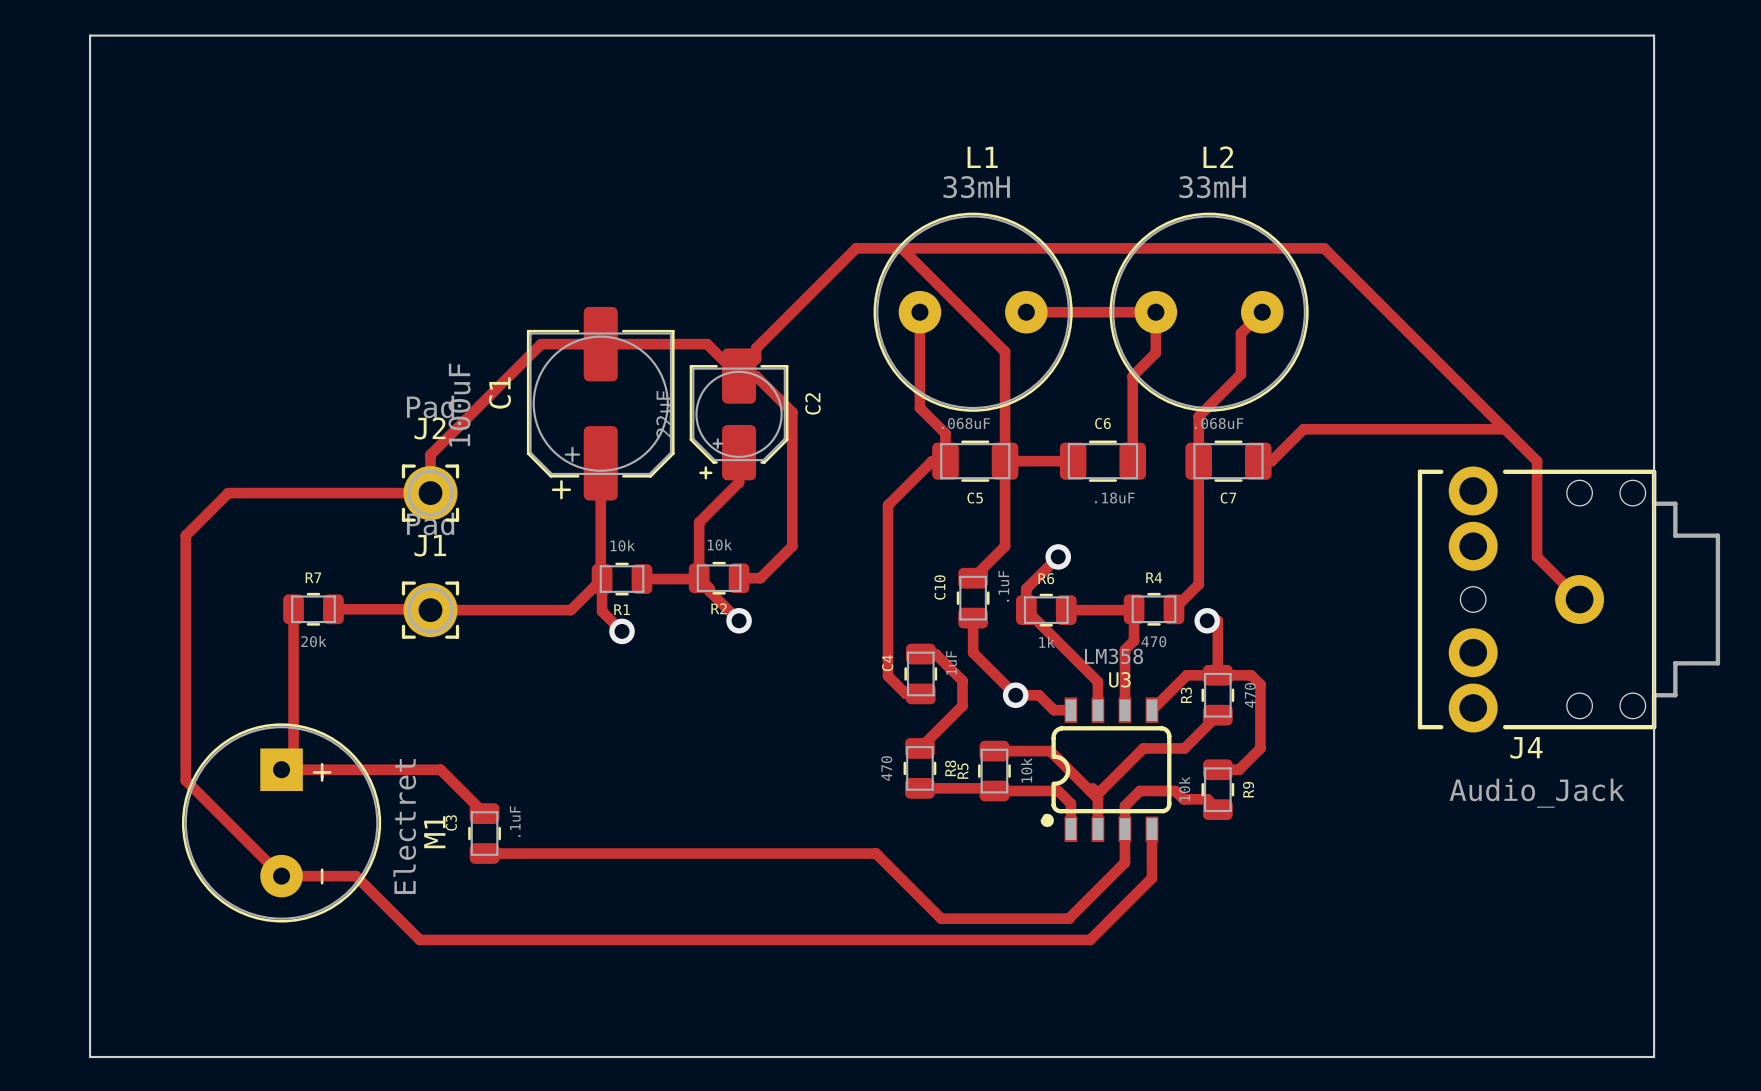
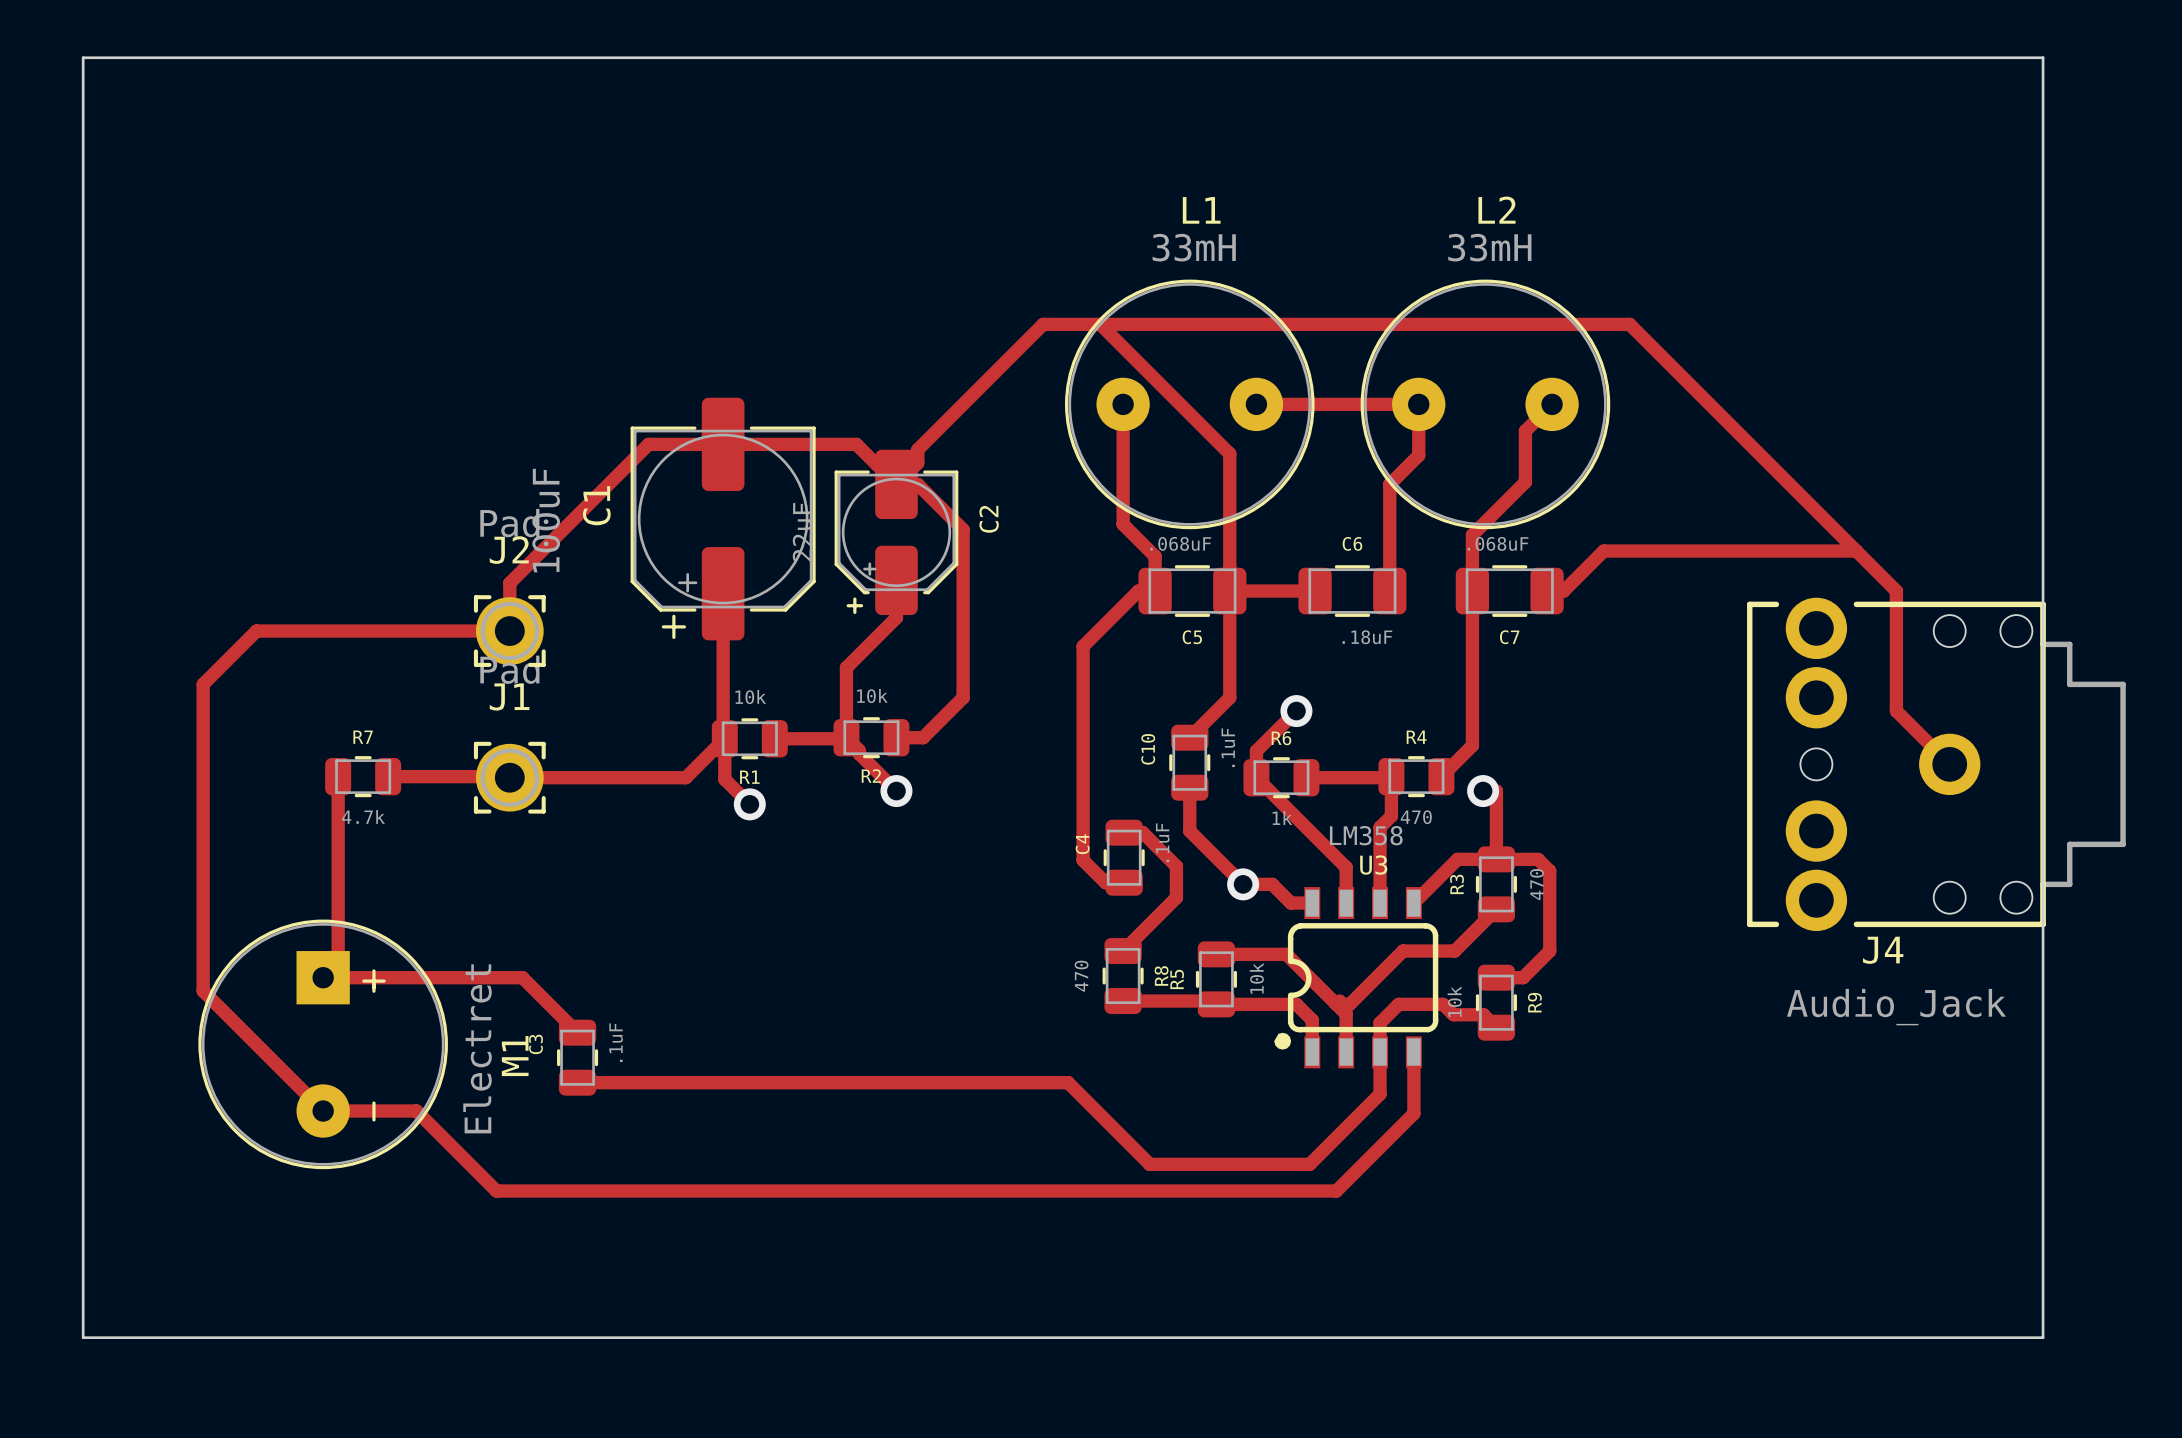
R7 value: 20k (313, 641) -> 4.7k (363, 816)
C4 value: 1uF (951, 662) -> .1uF (1162, 842)

